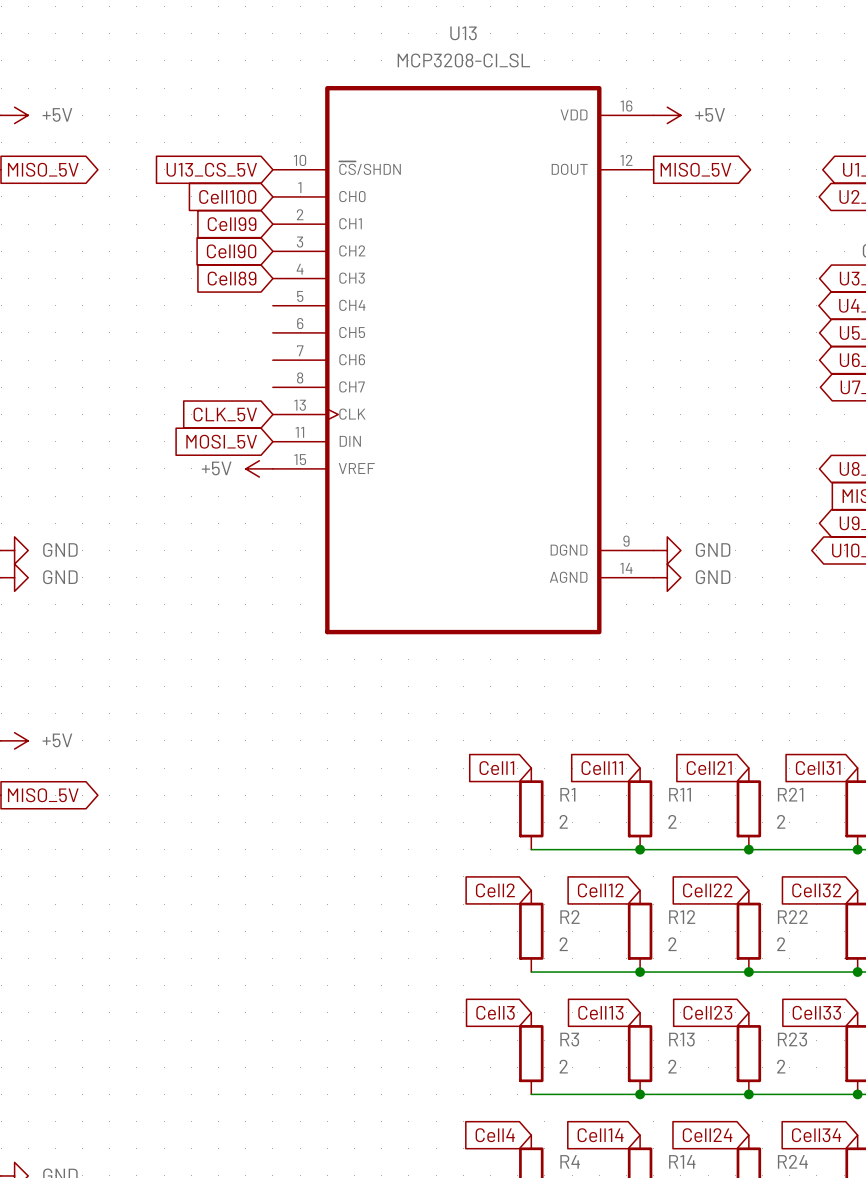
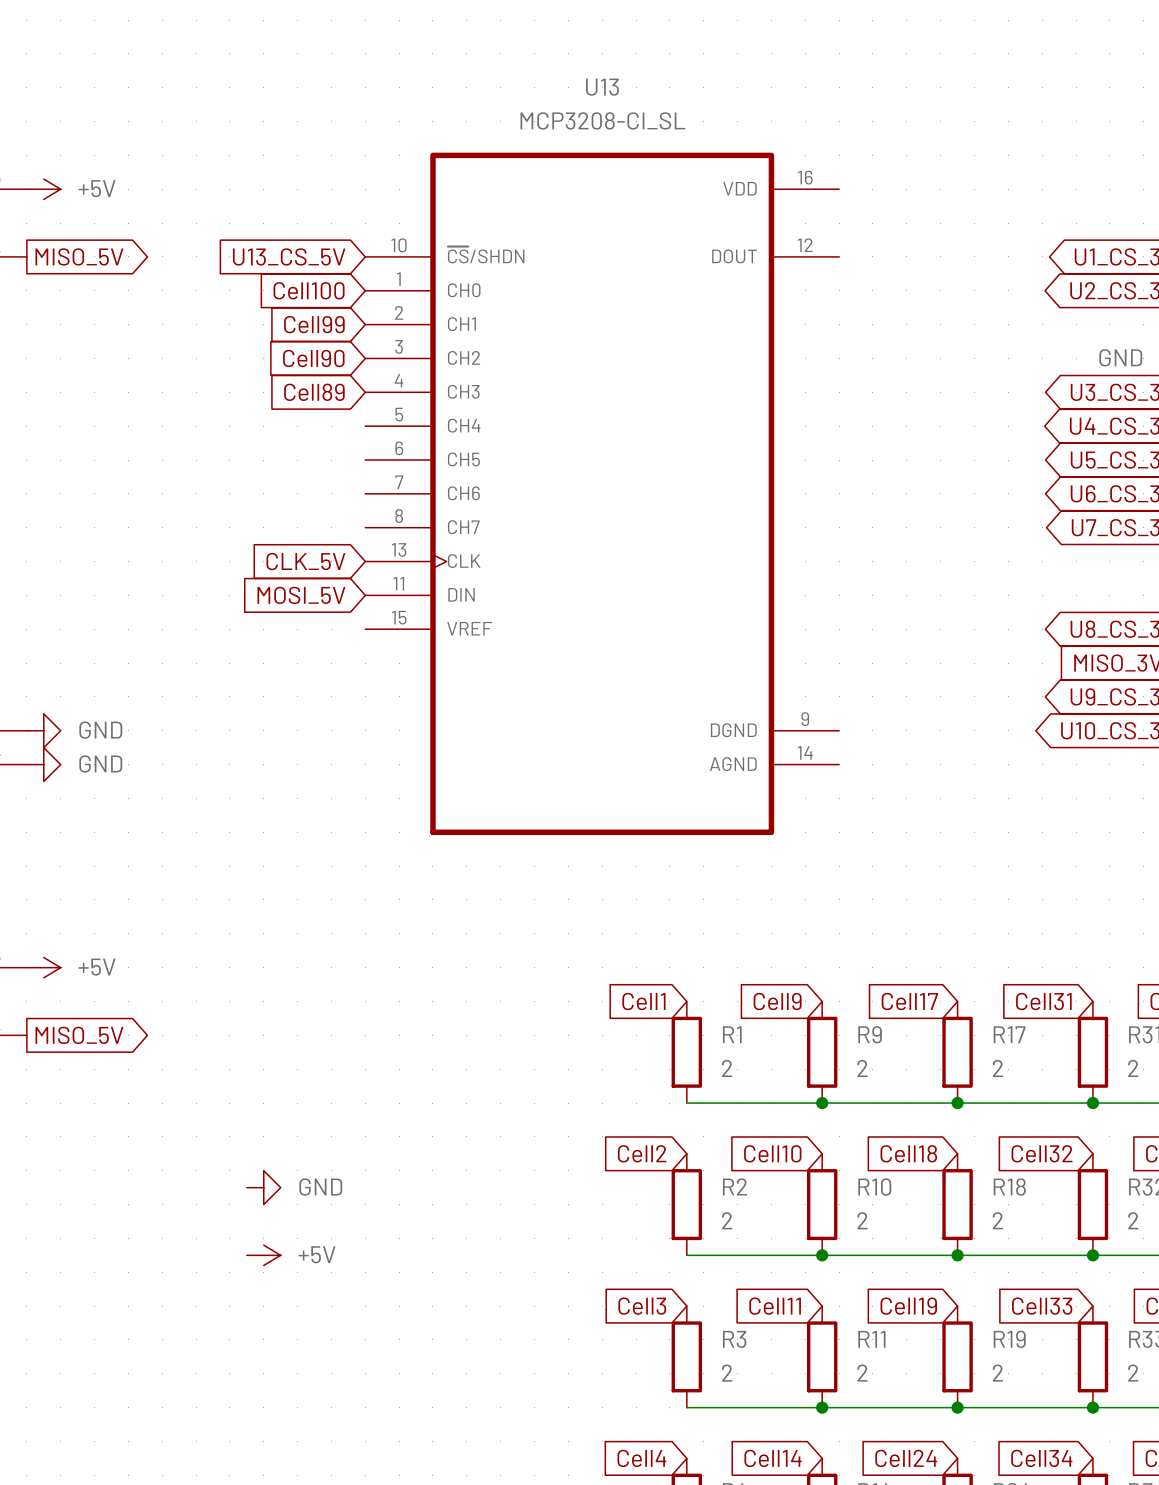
power symbol: +5V (667, 115) -> none
global label: MISO_5V (695, 169) -> none
power symbol: +5V (259, 468) -> none
power symbol: GND (667, 550) -> none
power symbol: GND (667, 577) -> none
global label: Cell11 (602, 768) -> Cell9 (777, 1001)
global label: Cell21 (709, 768) -> Cell17 (909, 1001)
R11 name: R11 (680, 794) -> R9 (870, 1034)
R21 name: R21 (790, 794) -> R17 (1009, 1034)
global label: Cell12 (600, 890) -> Cell10 (772, 1153)
global label: Cell22 (707, 890) -> Cell18 (908, 1153)
power symbol: none -> GND (263, 1187)
R12 name: R12 (682, 917) -> R10 (874, 1187)
R22 name: R22 (792, 917) -> R18 (1009, 1186)
power symbol: none -> +5V (263, 1255)
global label: Cell13 (600, 1012) -> Cell11 (775, 1306)
global label: Cell23 (707, 1012) -> Cell19 (908, 1306)
R13 name: R13 (681, 1039) -> R11 (871, 1339)
R23 name: R23 (792, 1039) -> R19 (1009, 1339)

